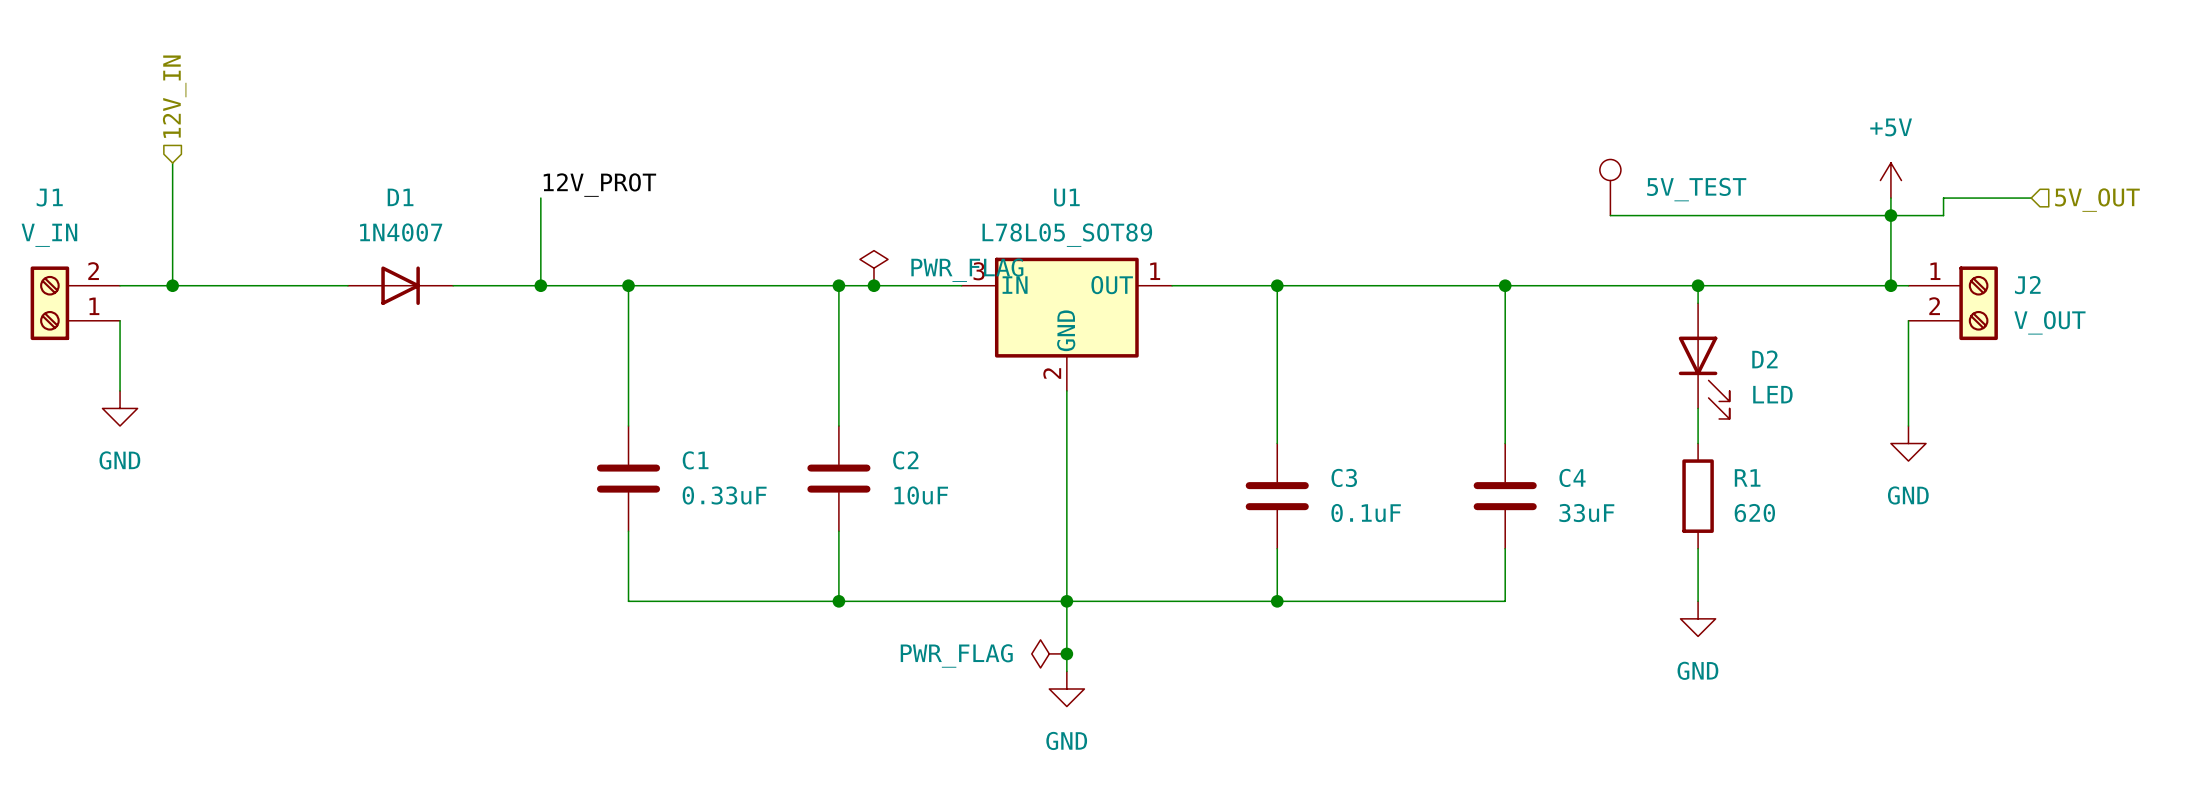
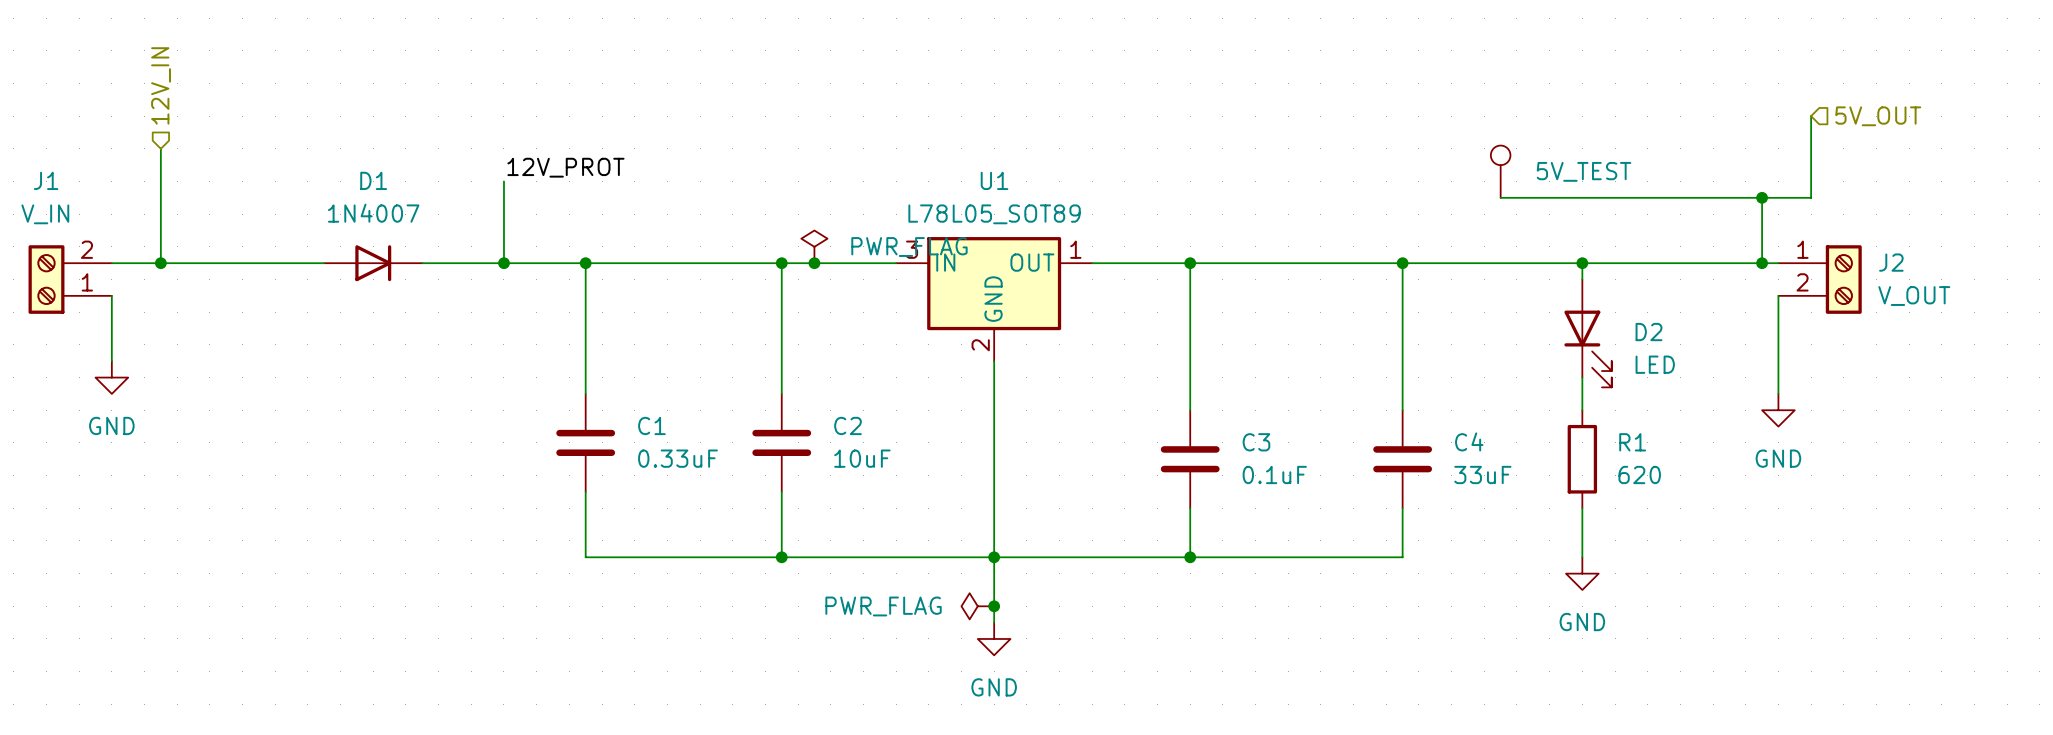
power symbol: +5V (1890, 180) -> none
wire: (1890, 198) (1890, 215) -> none
wire: (1943, 198) (2031, 198) -> (1811, 181) (1811, 116)
hierarchical label position: 5V_OUT (2097, 200) -> 5V_OUT (1878, 116)

